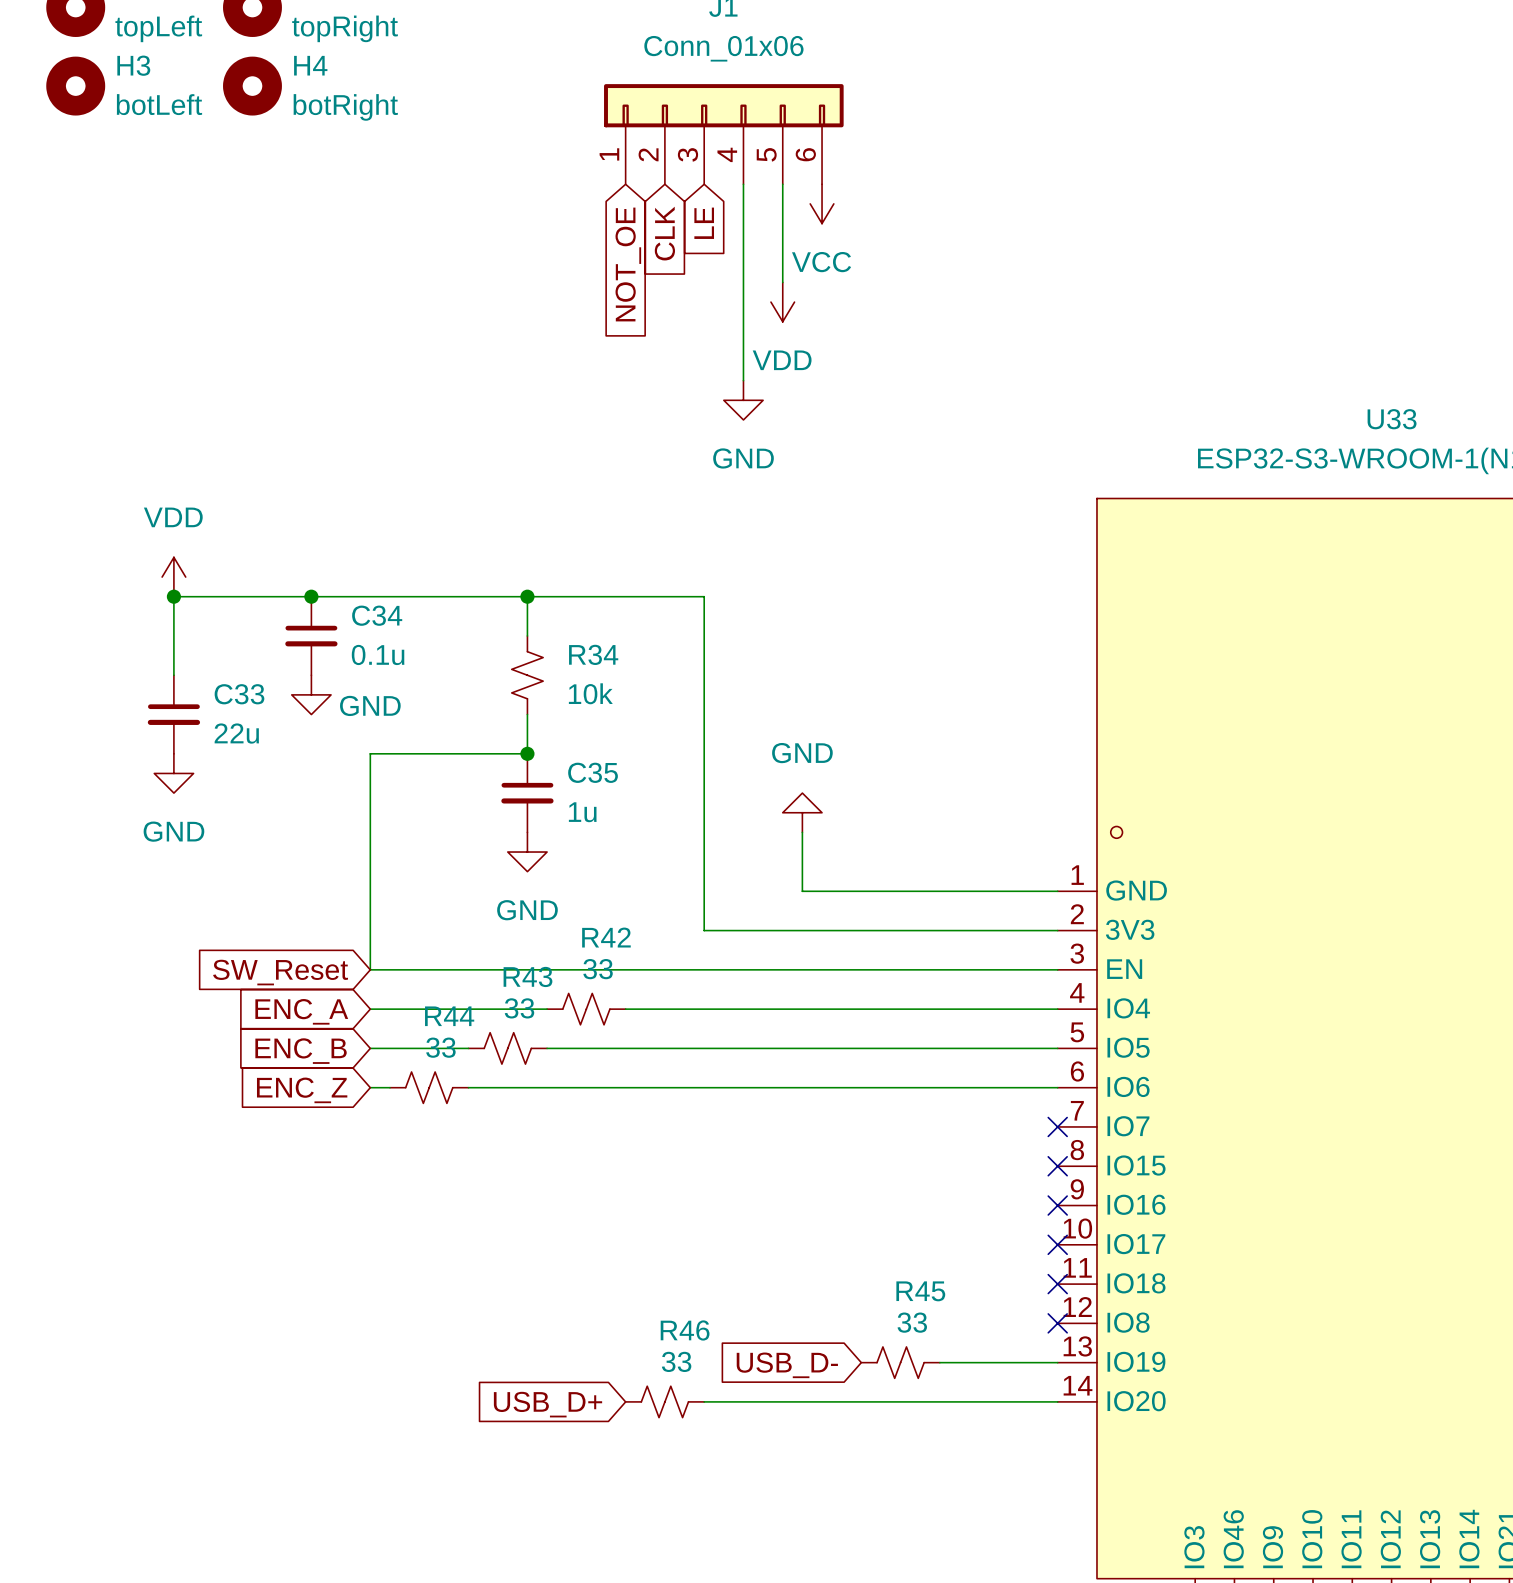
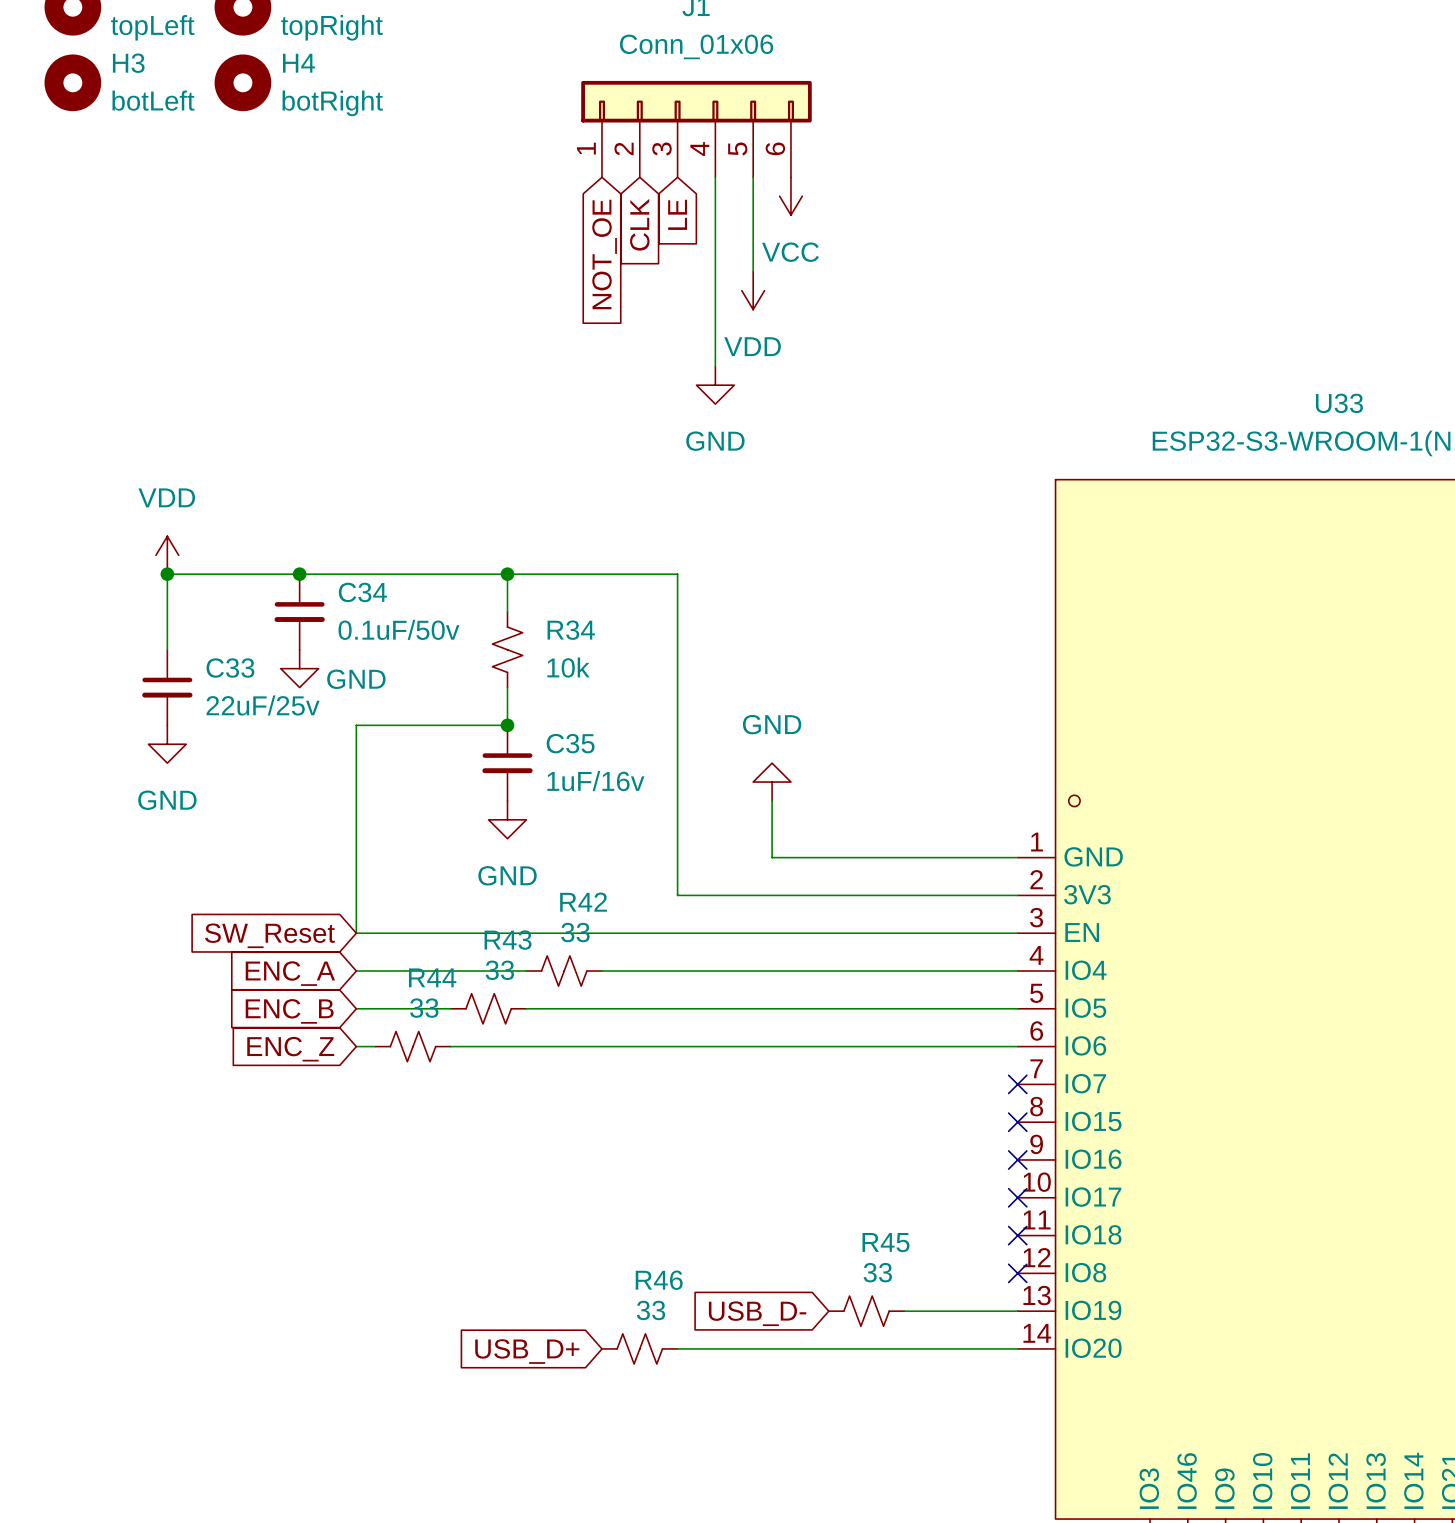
C34 value: 0.1u (378, 654) -> 0.1uF/50v (399, 629)
C33 value: 22u (236, 733) -> 22uF/25v (263, 705)
C35 value: 1u (582, 812) -> 1uF/16v (595, 781)

